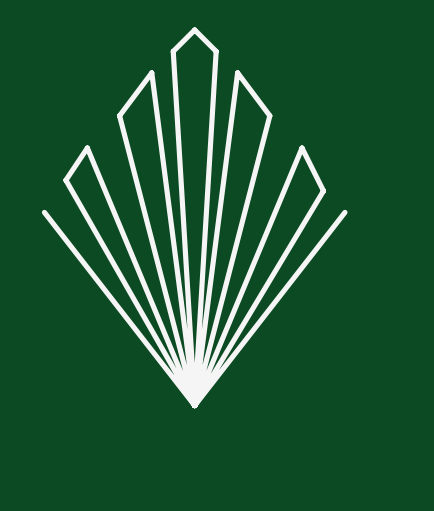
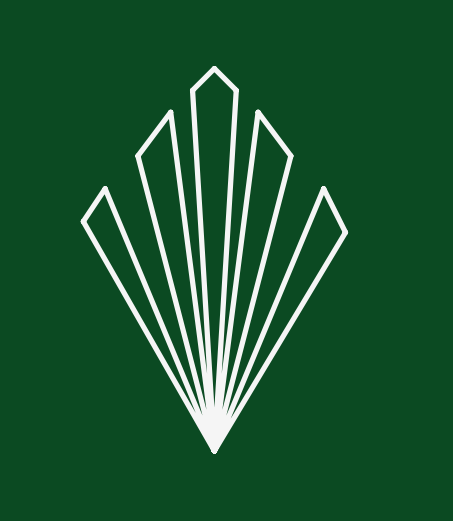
line: (44, 212) (194, 405) (344, 212) -> none

